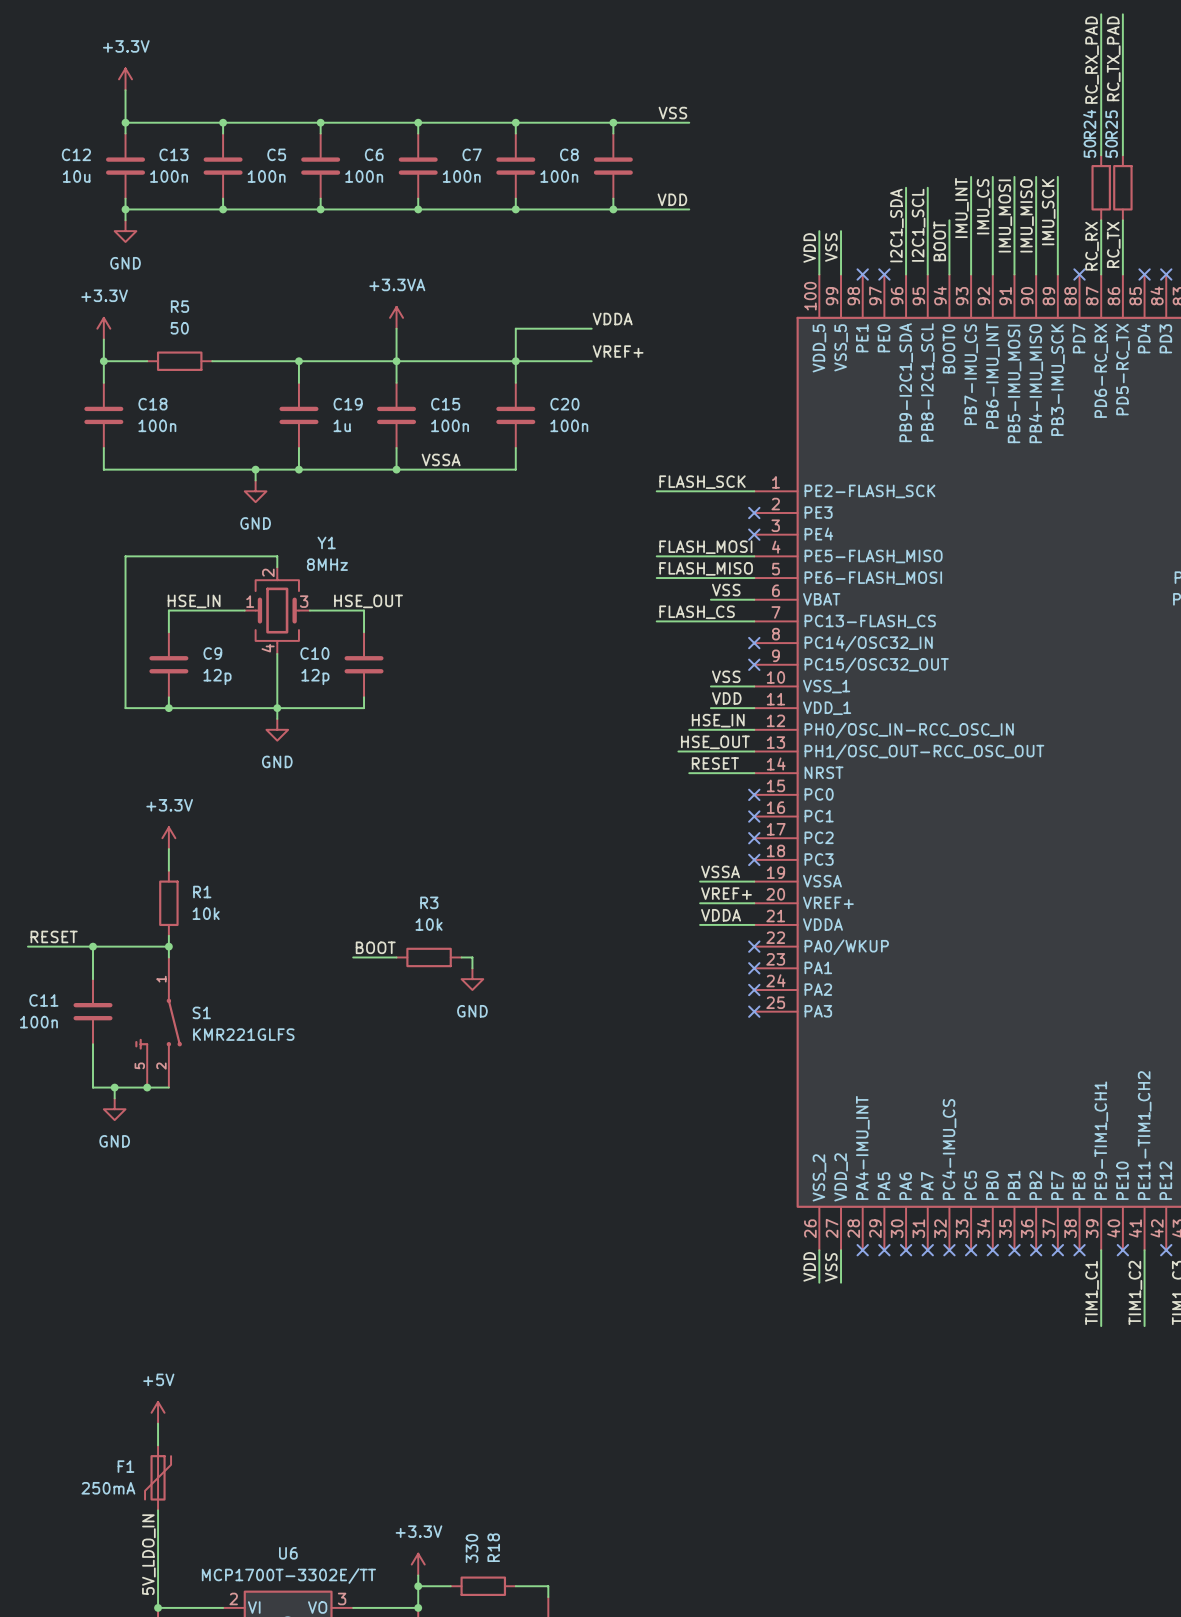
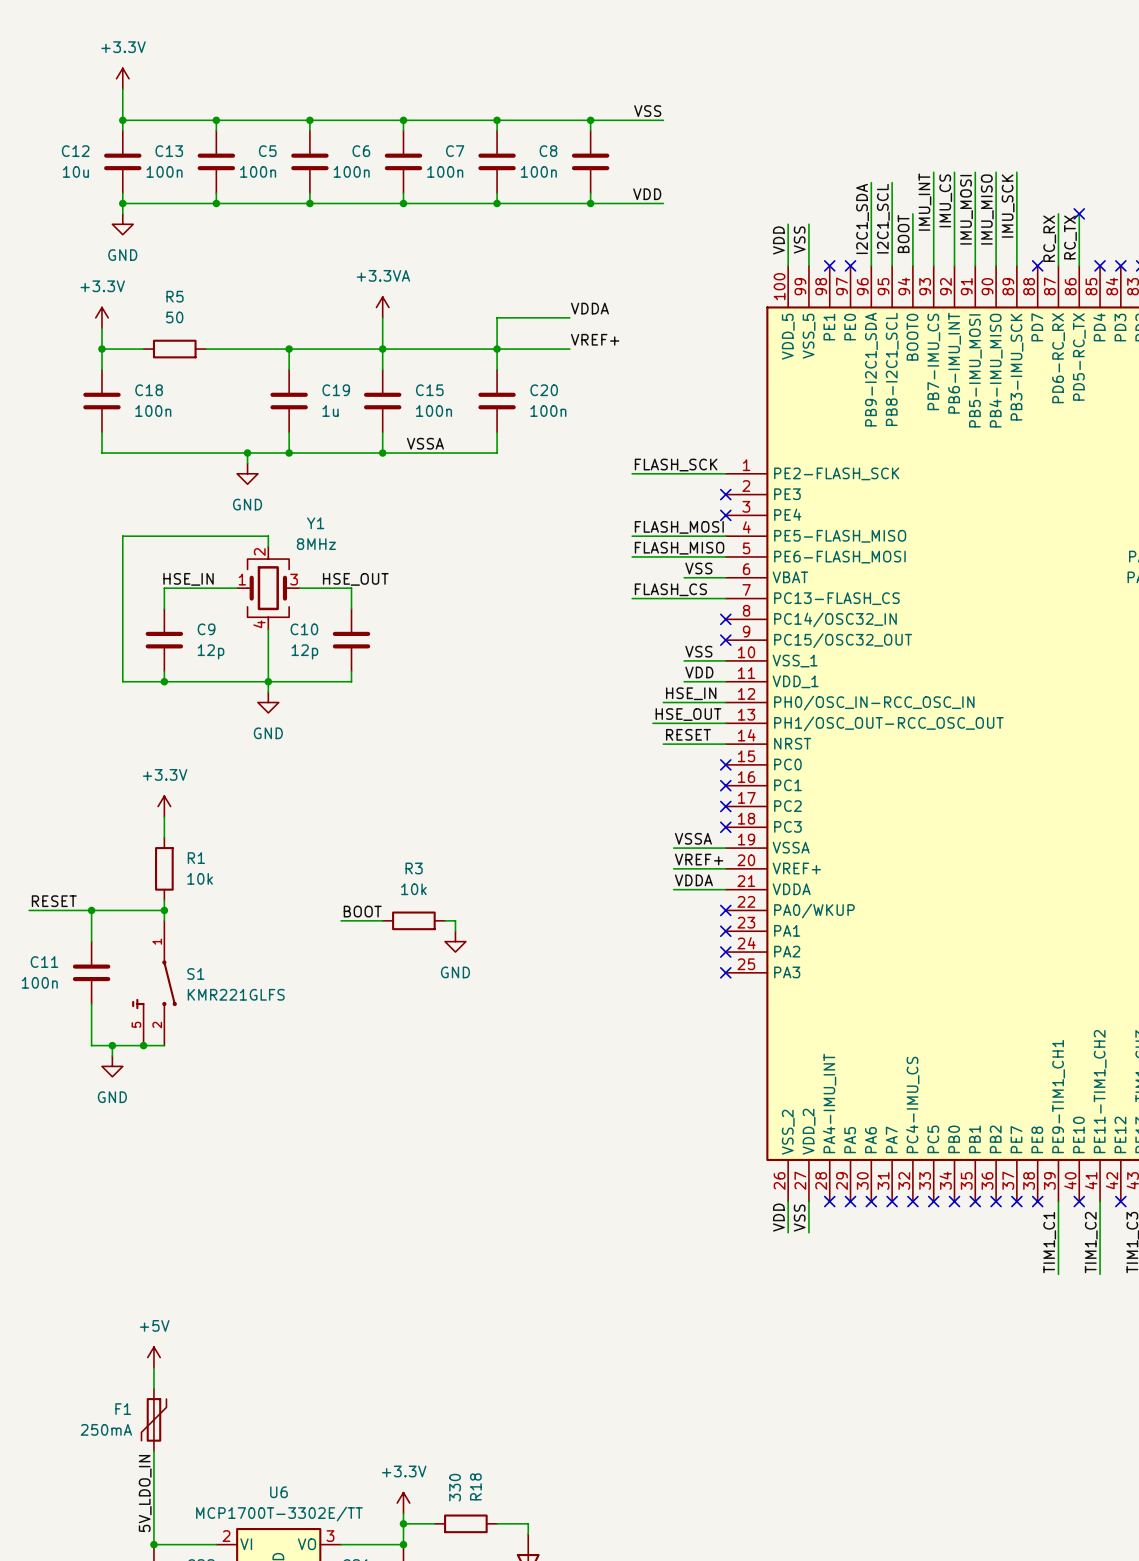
wire: (1101, 14) (1101, 155) -> none
wire: (1122, 14) (1122, 155) -> none
label: RC_TX_PAD (1113, 58) -> none
label: RC_RX_PAD (1092, 60) -> none
R24: 50 (1101, 187) -> none
R25: 50 (1122, 187) -> none
no-connect mark: none -> (1079, 213)

